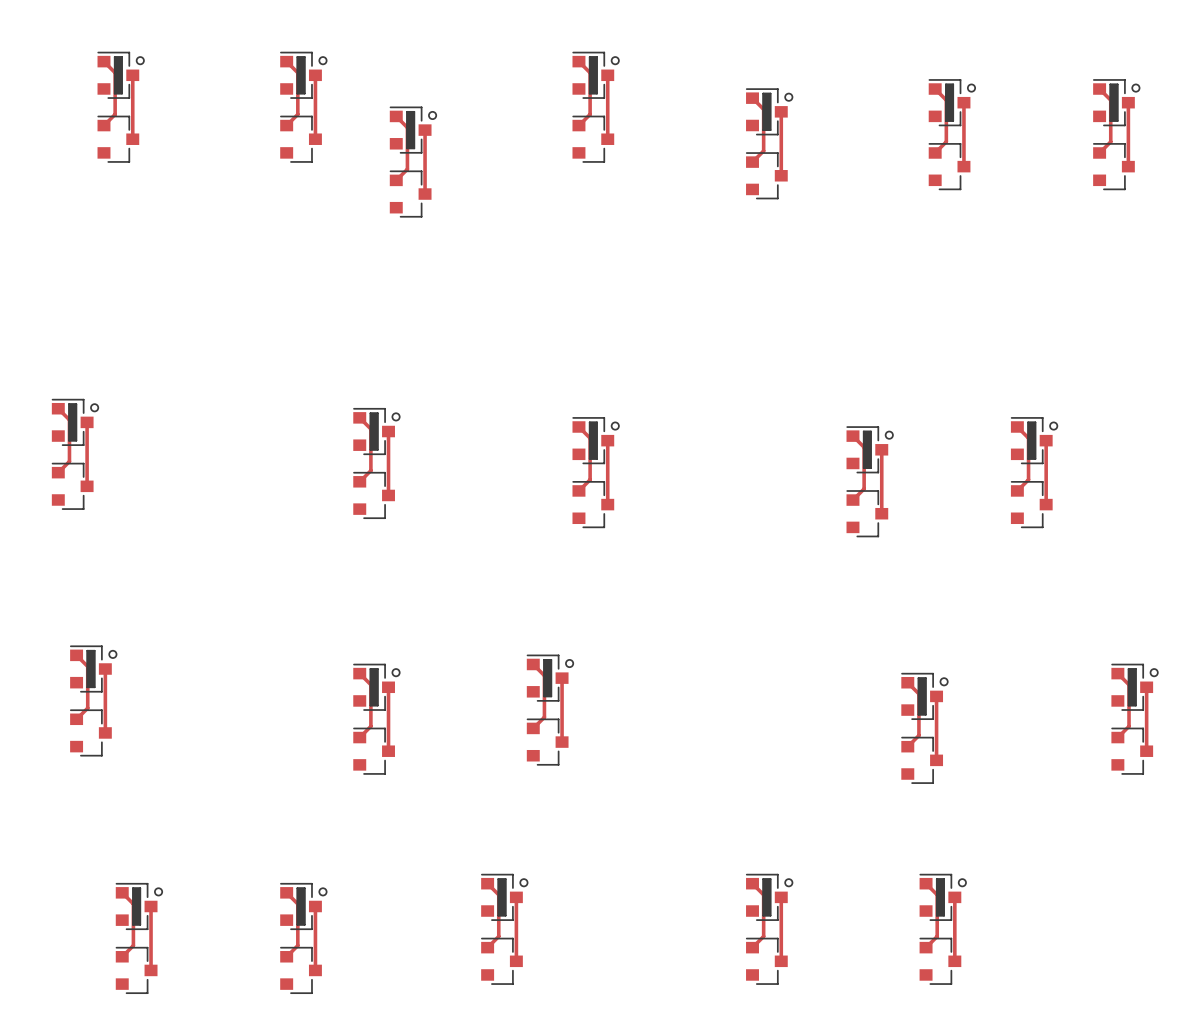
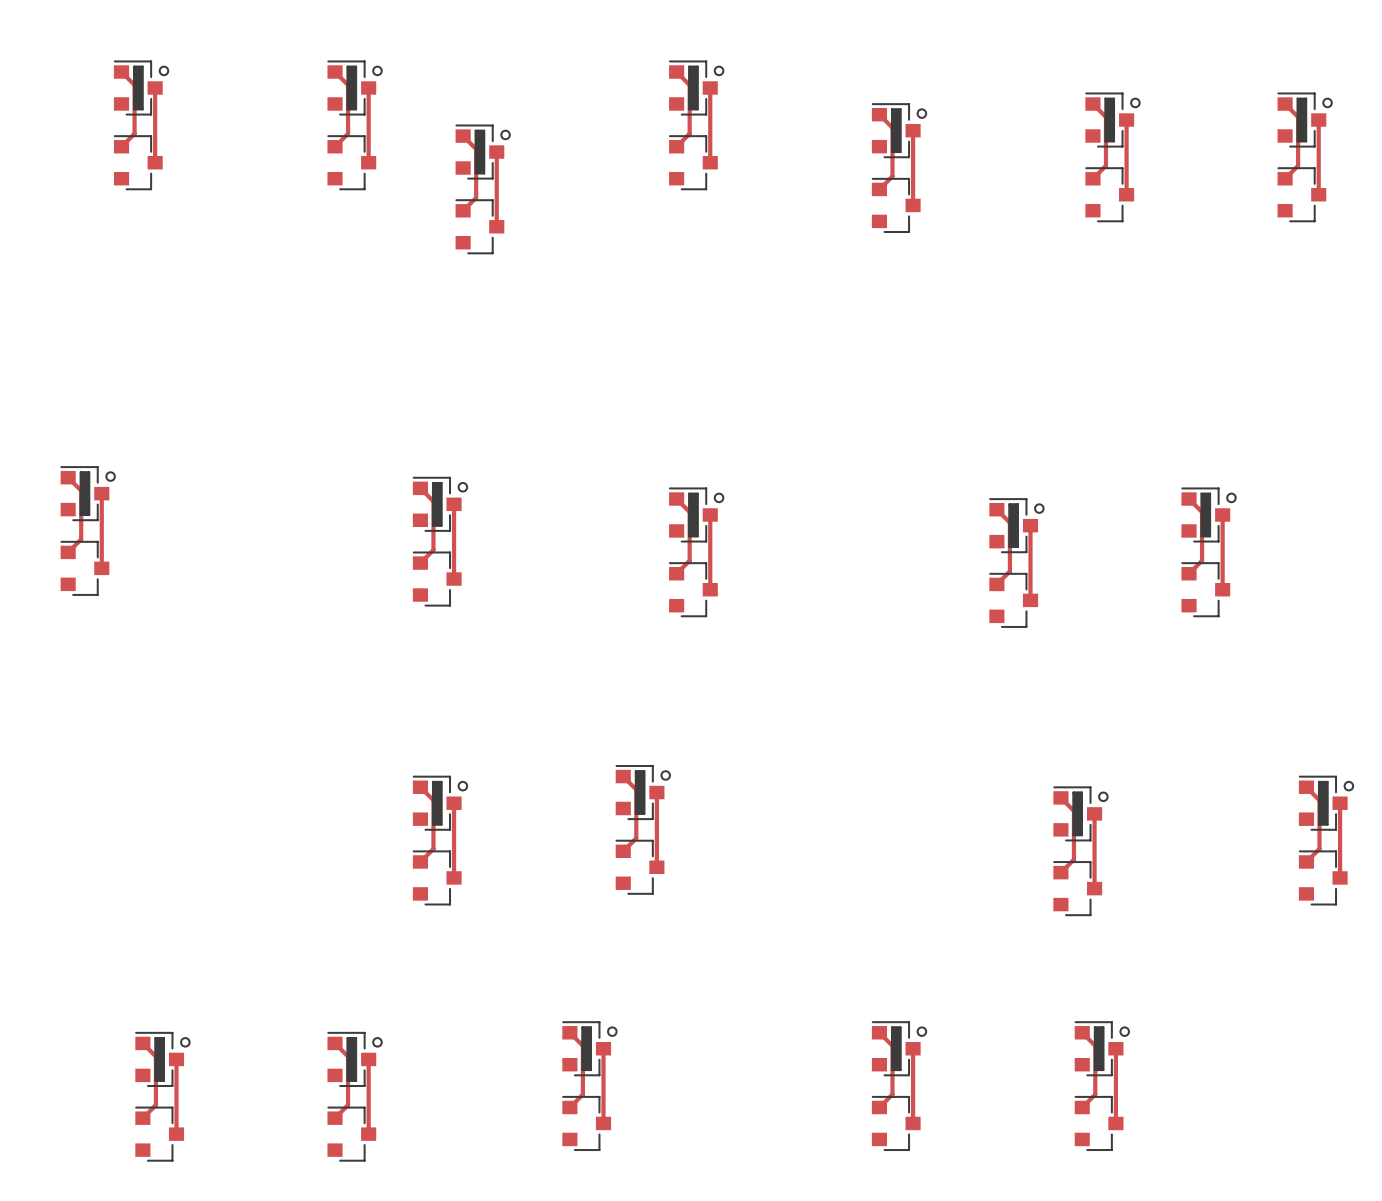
track: (76, 655) (87, 666) (87, 708) (76, 719) -> none
part: (93, 669) -> none
track: (105, 669) (105, 732) -> none
part: (90, 732) -> none

